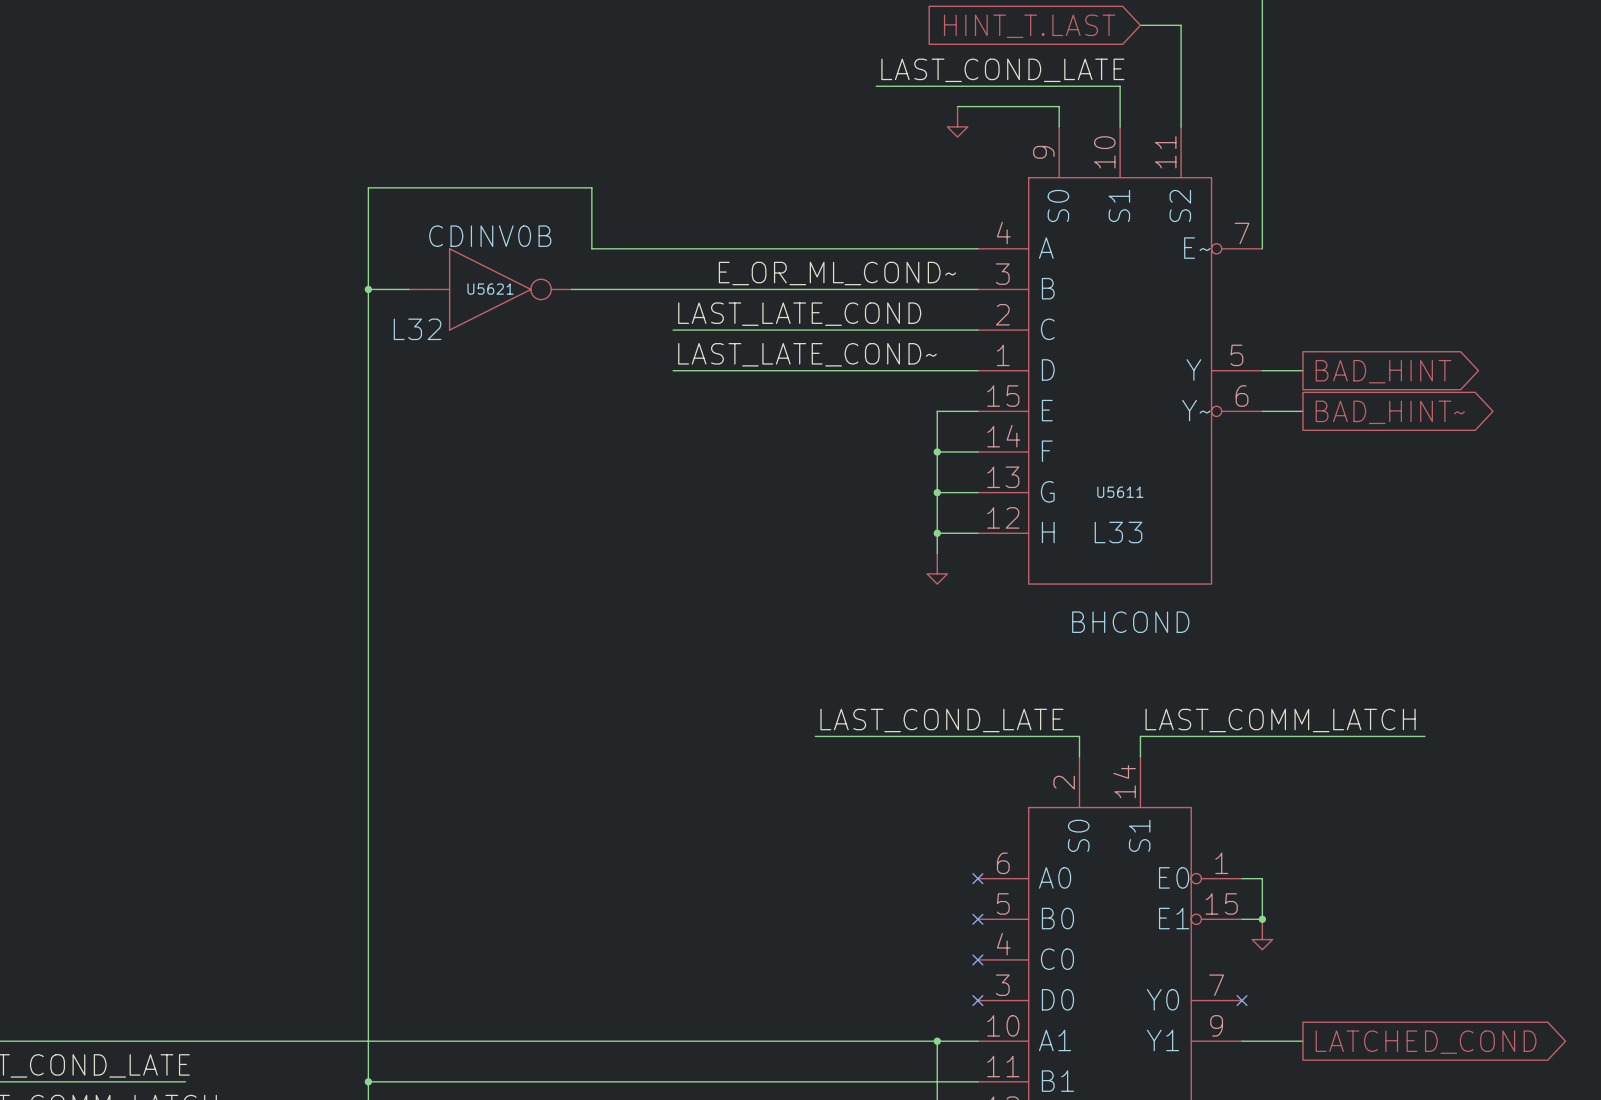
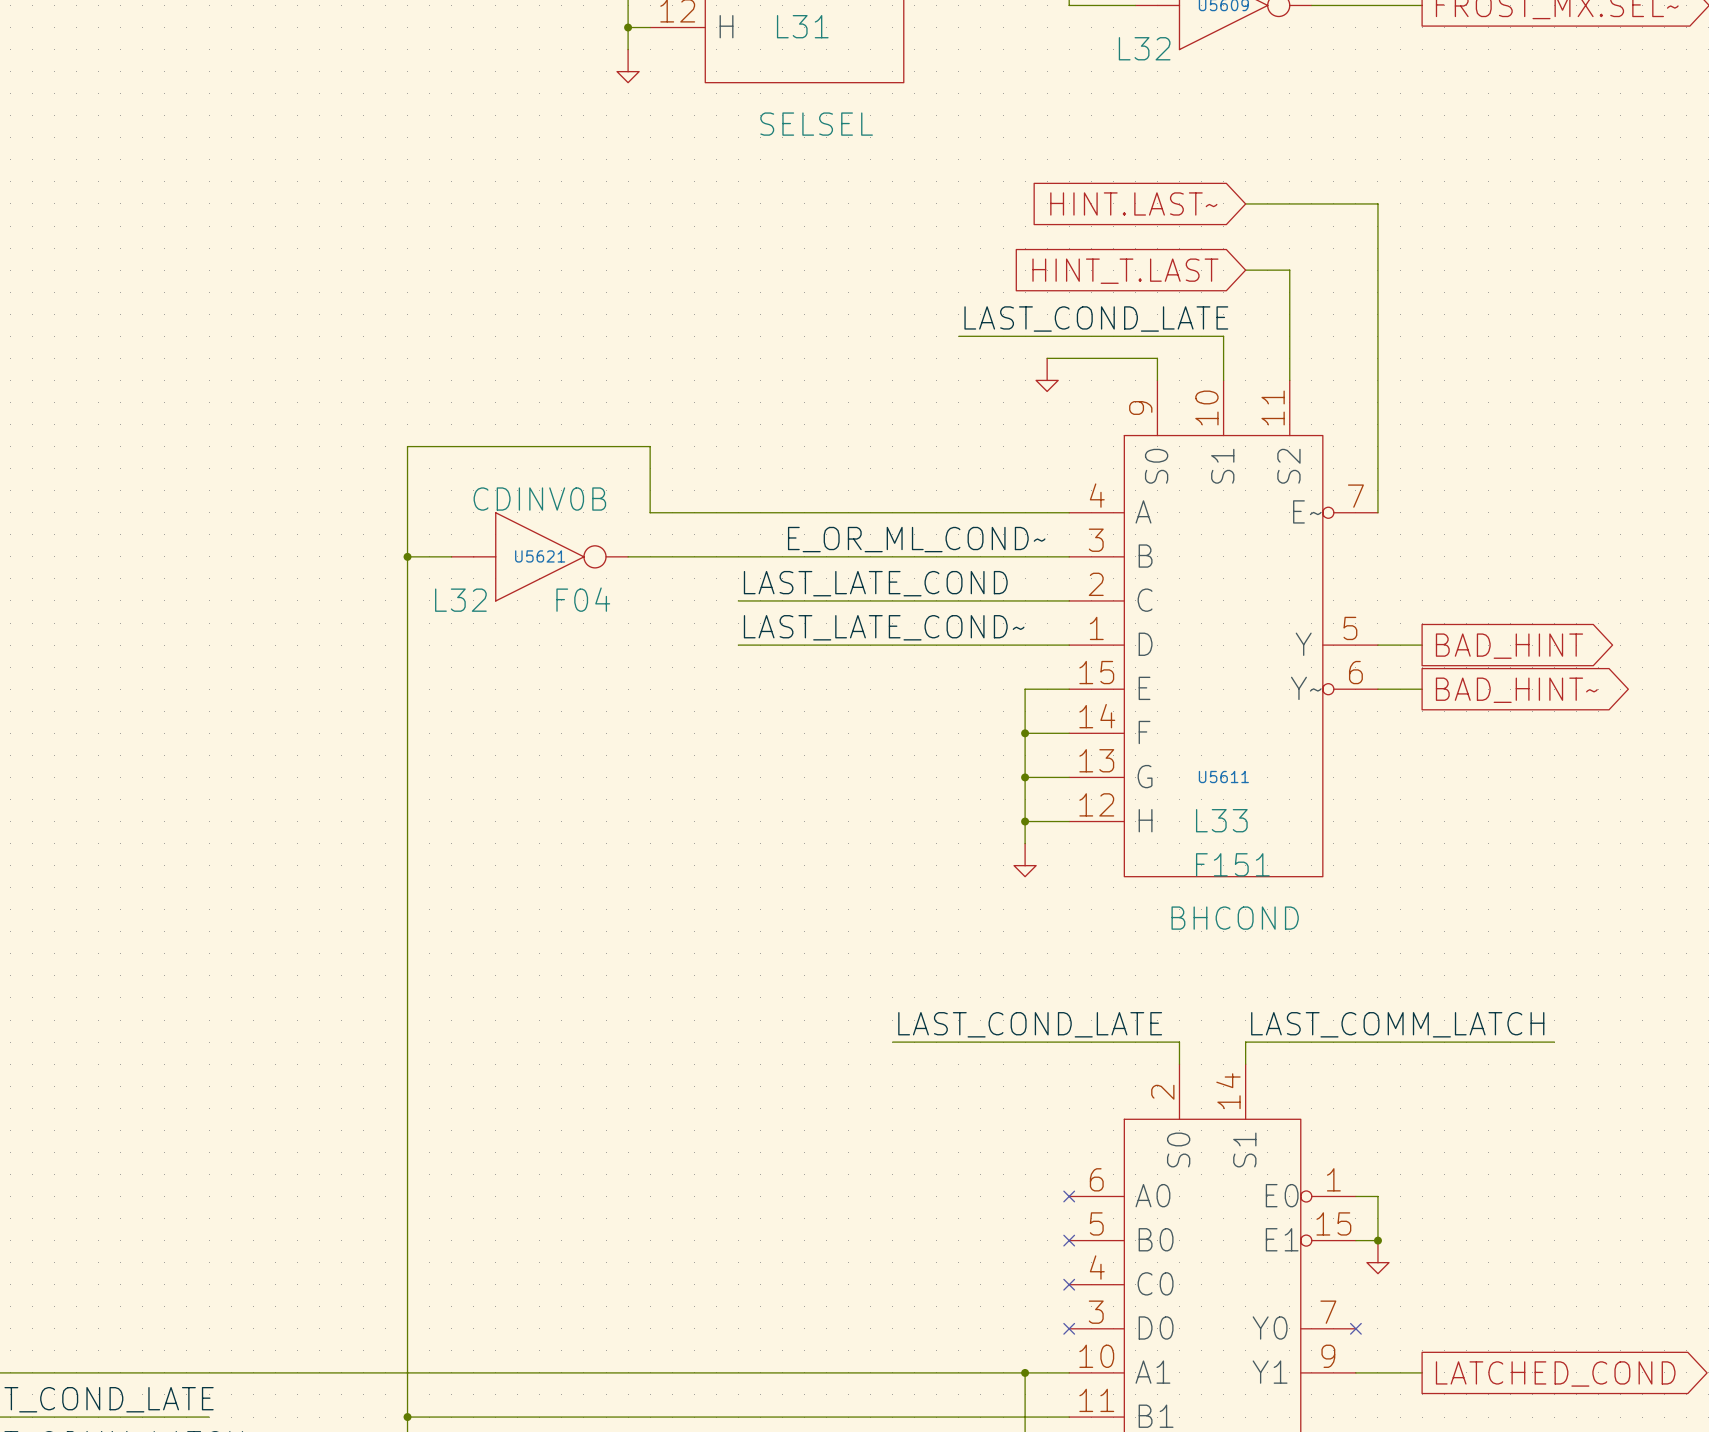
U5621 value: none -> F04 (583, 599)
U5611 value: none -> F151 (1232, 864)

